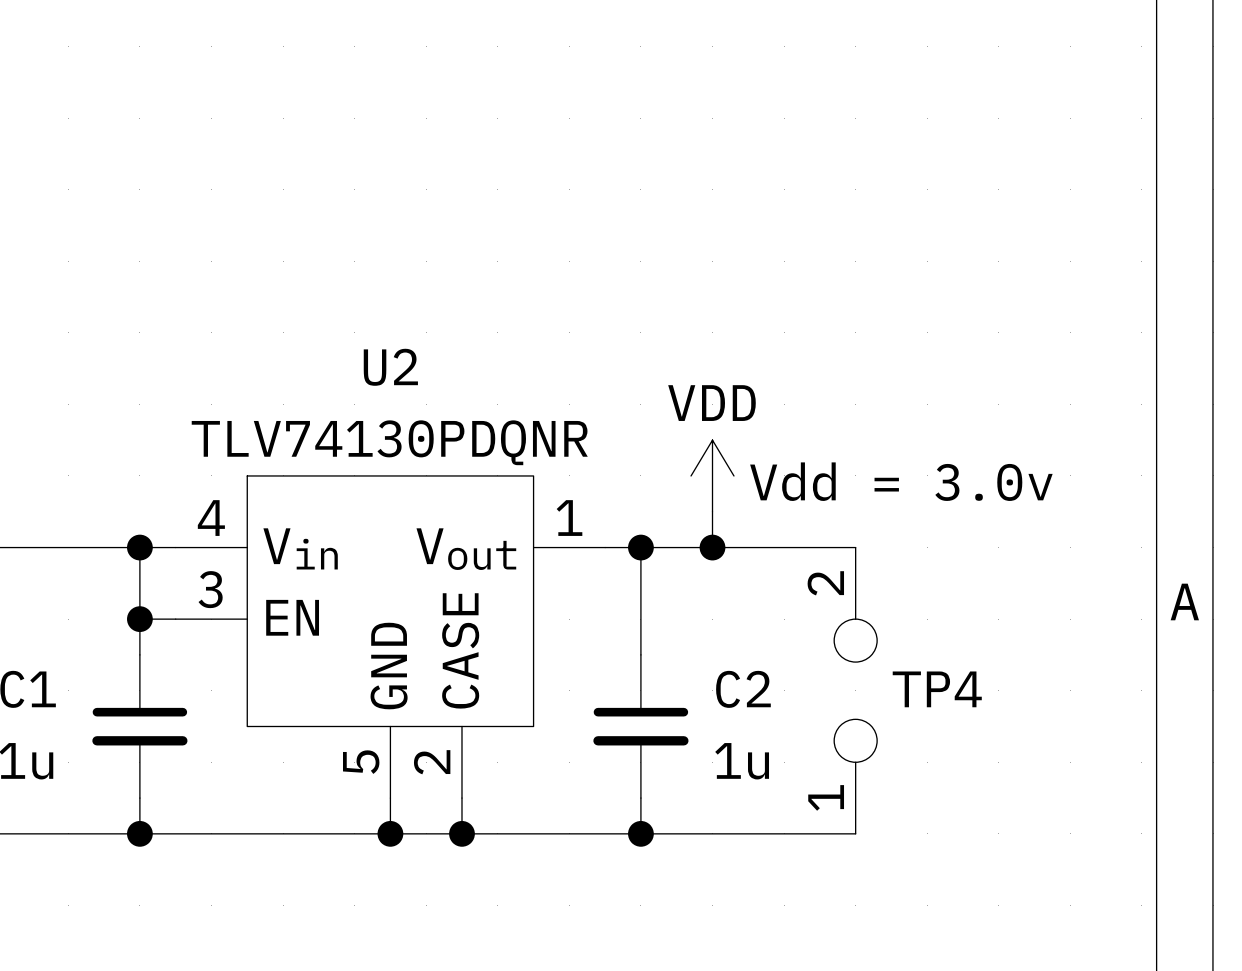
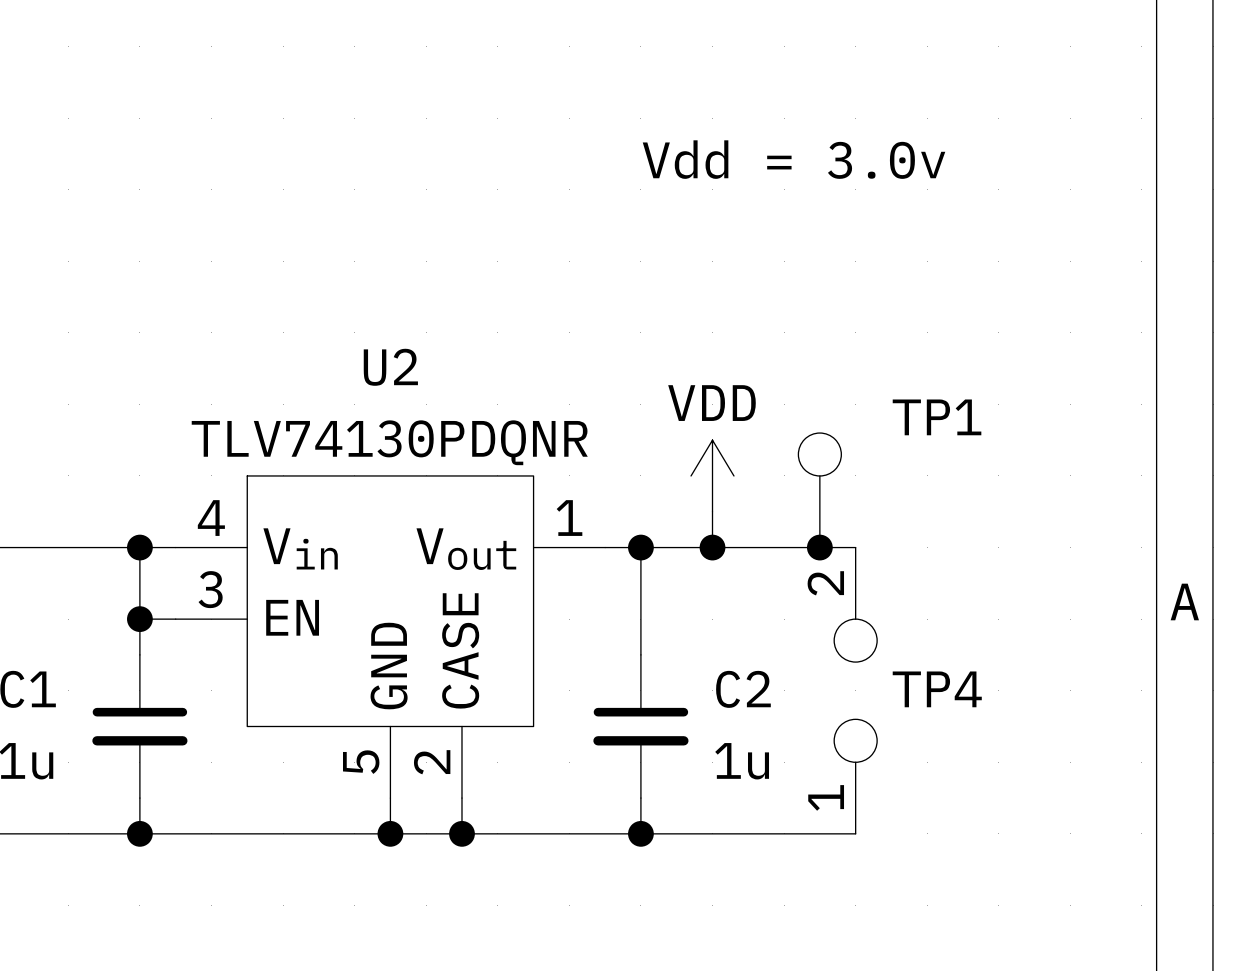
text position: Vdd = 3.0v (901, 481) -> Vdd = 3.0v (794, 159)
TP1: none -> (819, 490)
junction: none -> (819, 547)

